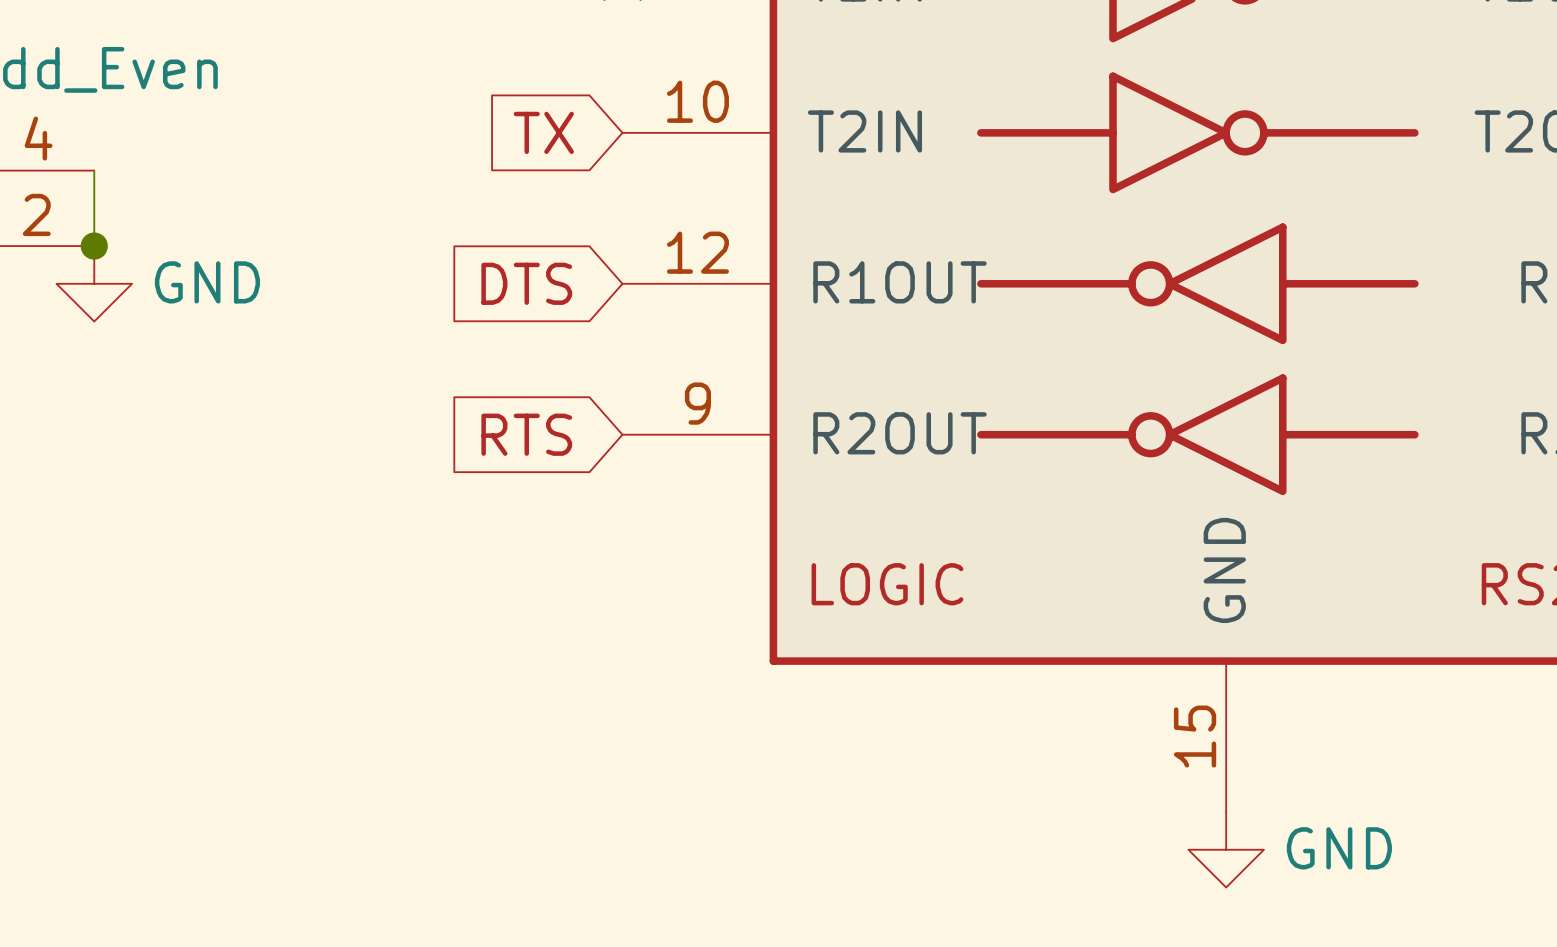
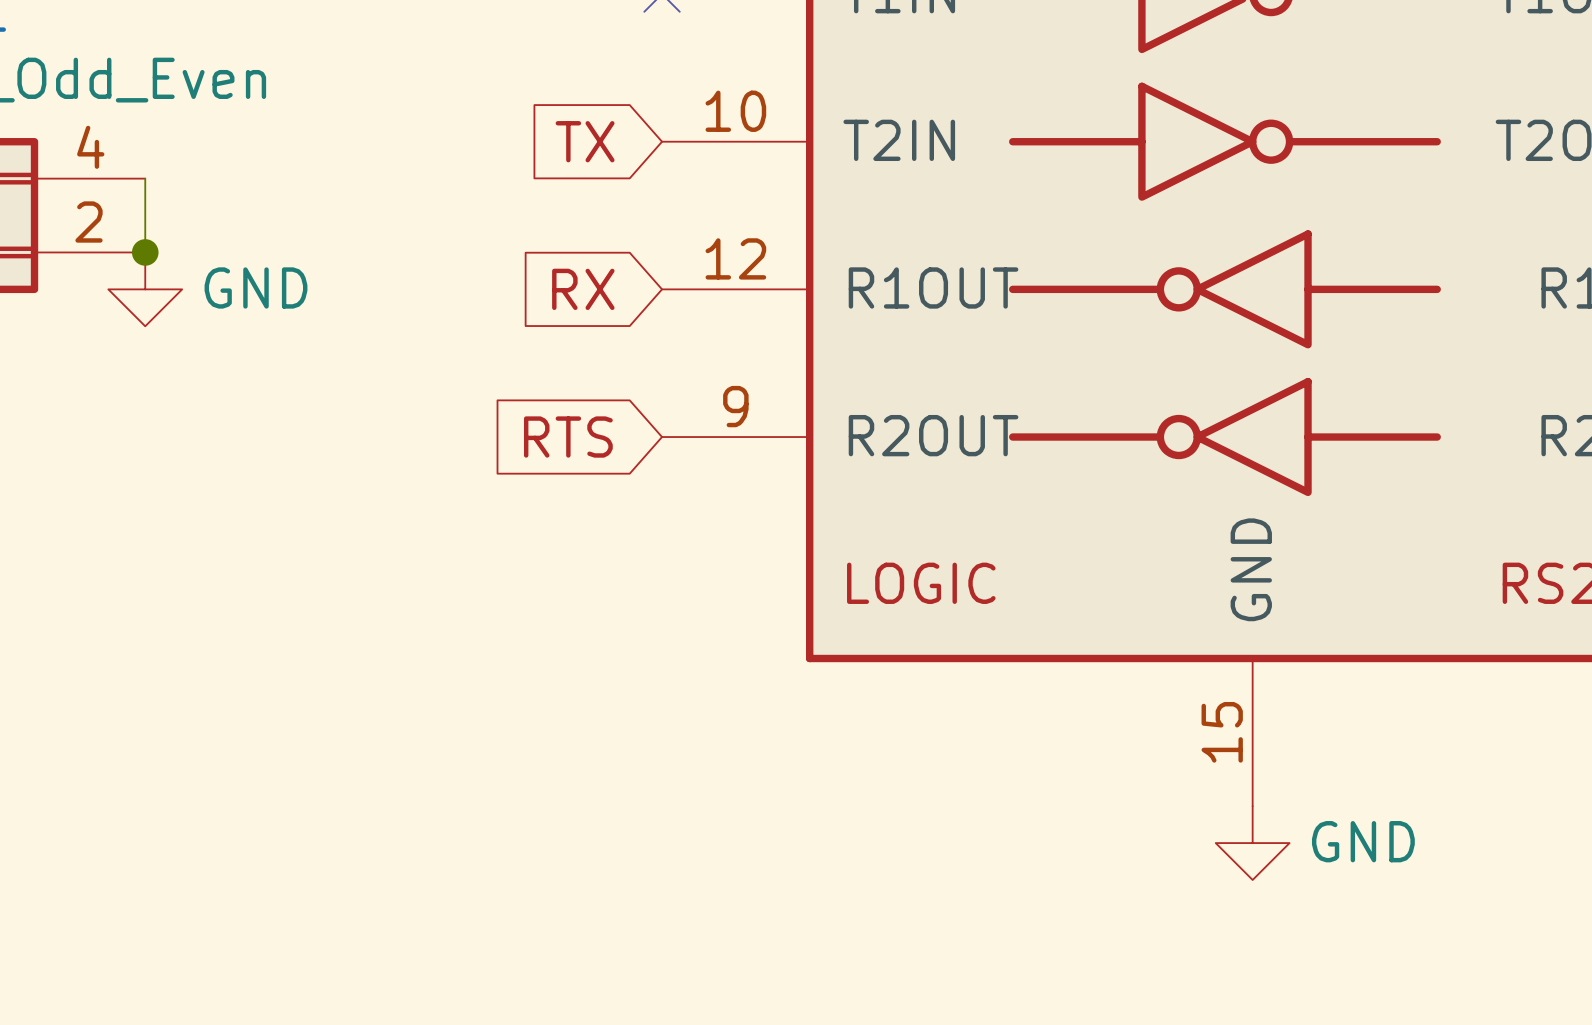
global label: DTS (526, 283) -> RX (583, 289)

